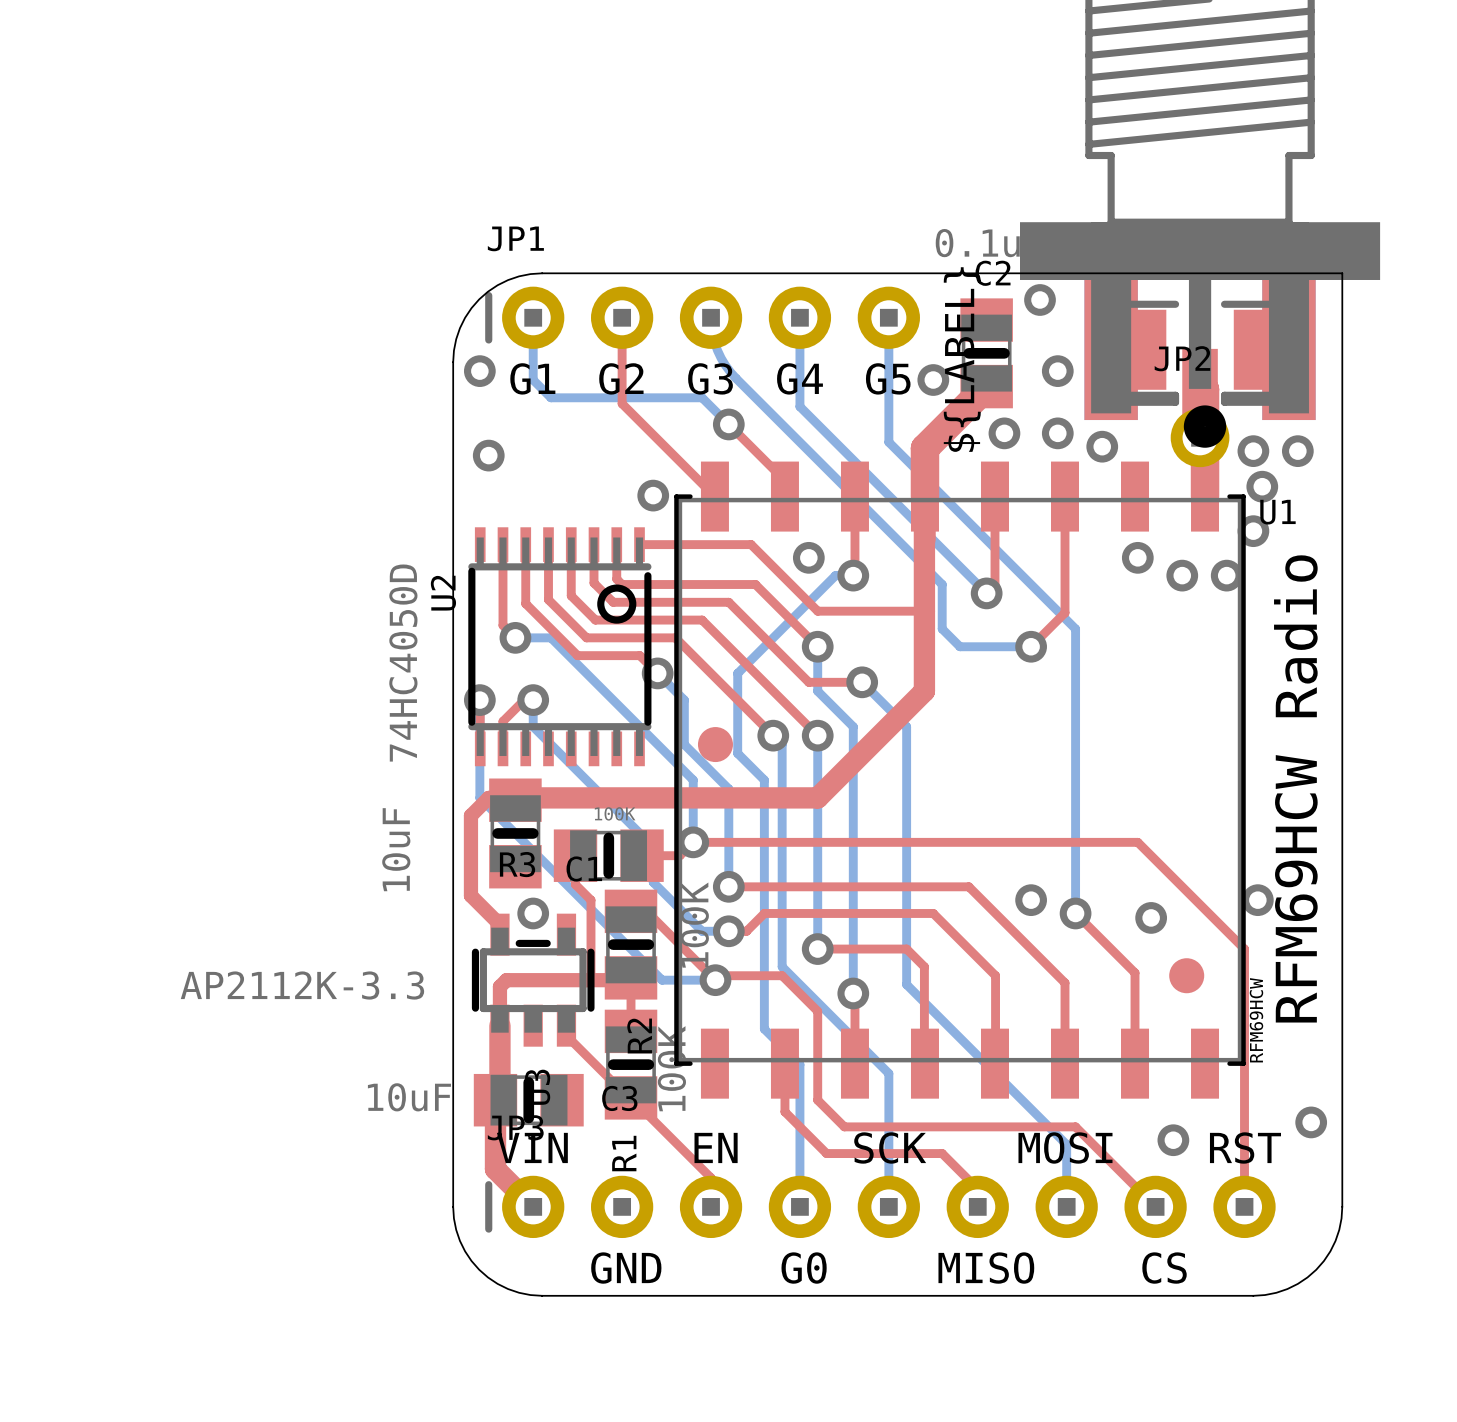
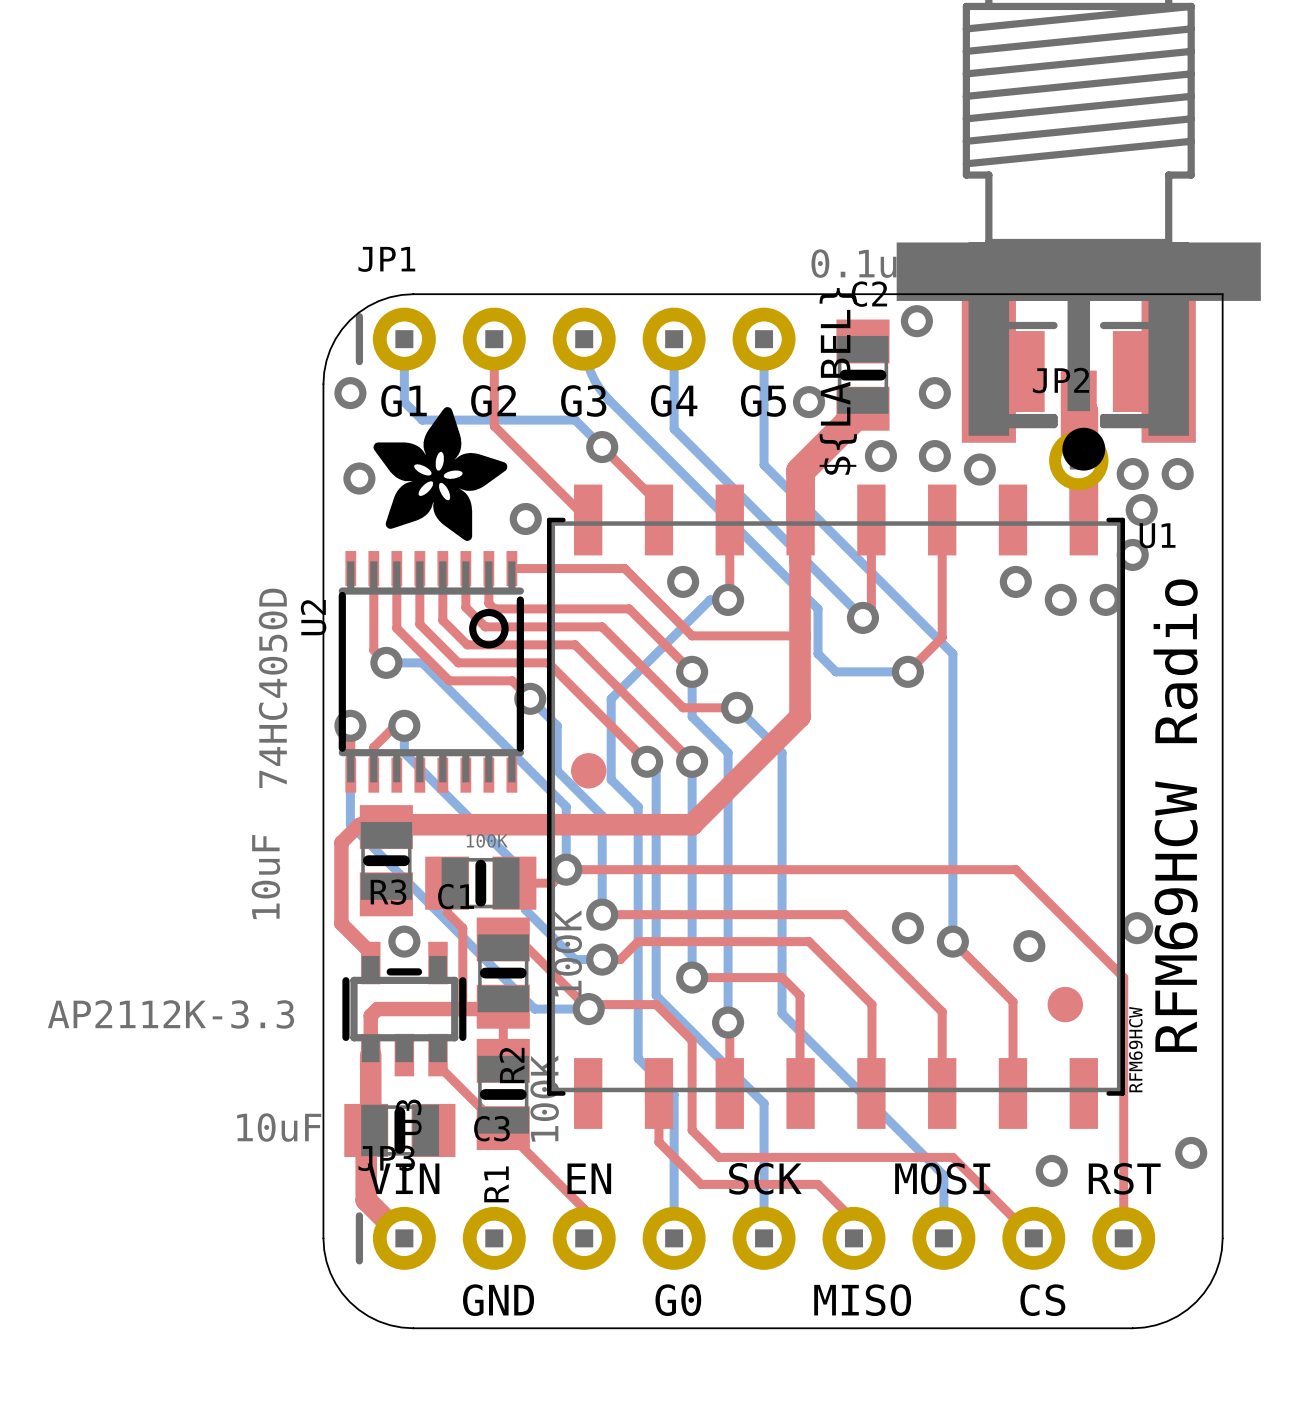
drawing: none -> [373, 407, 508, 541]

